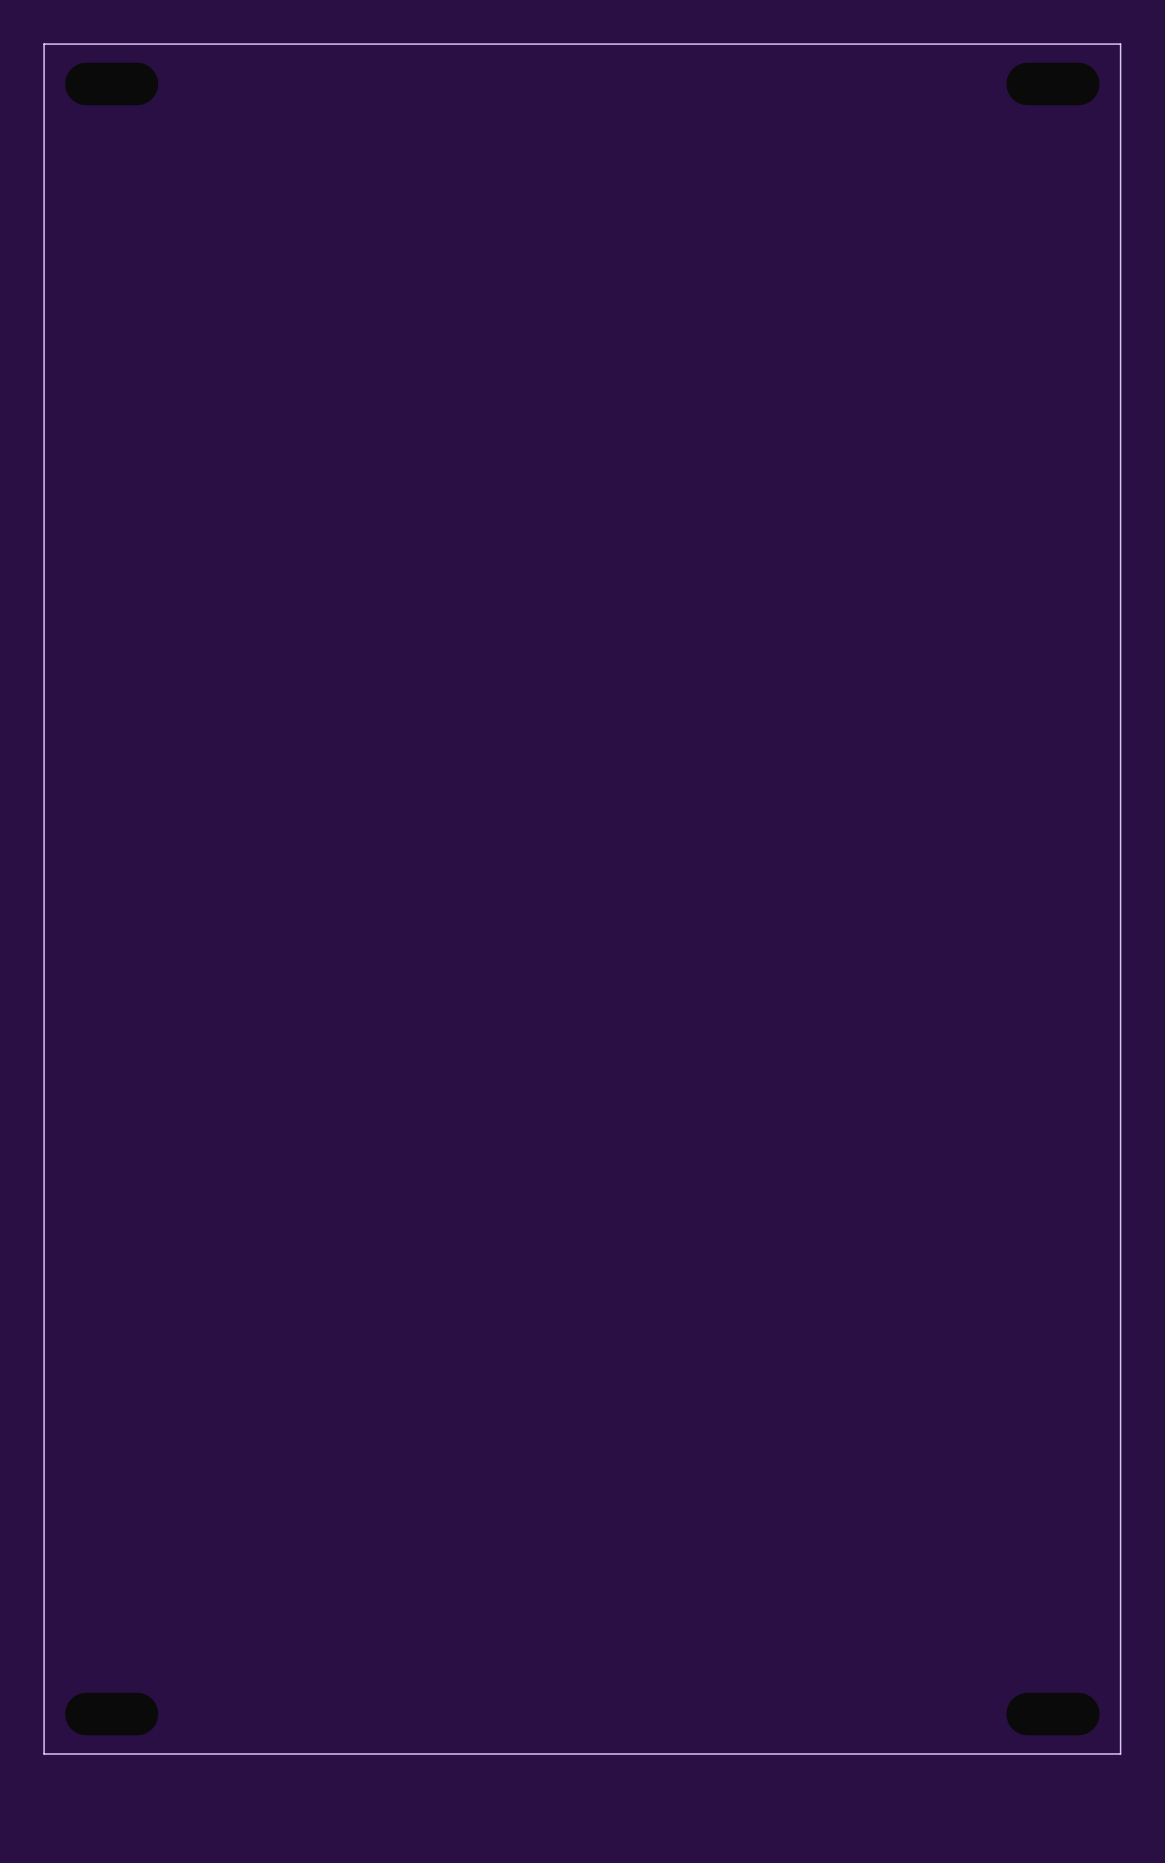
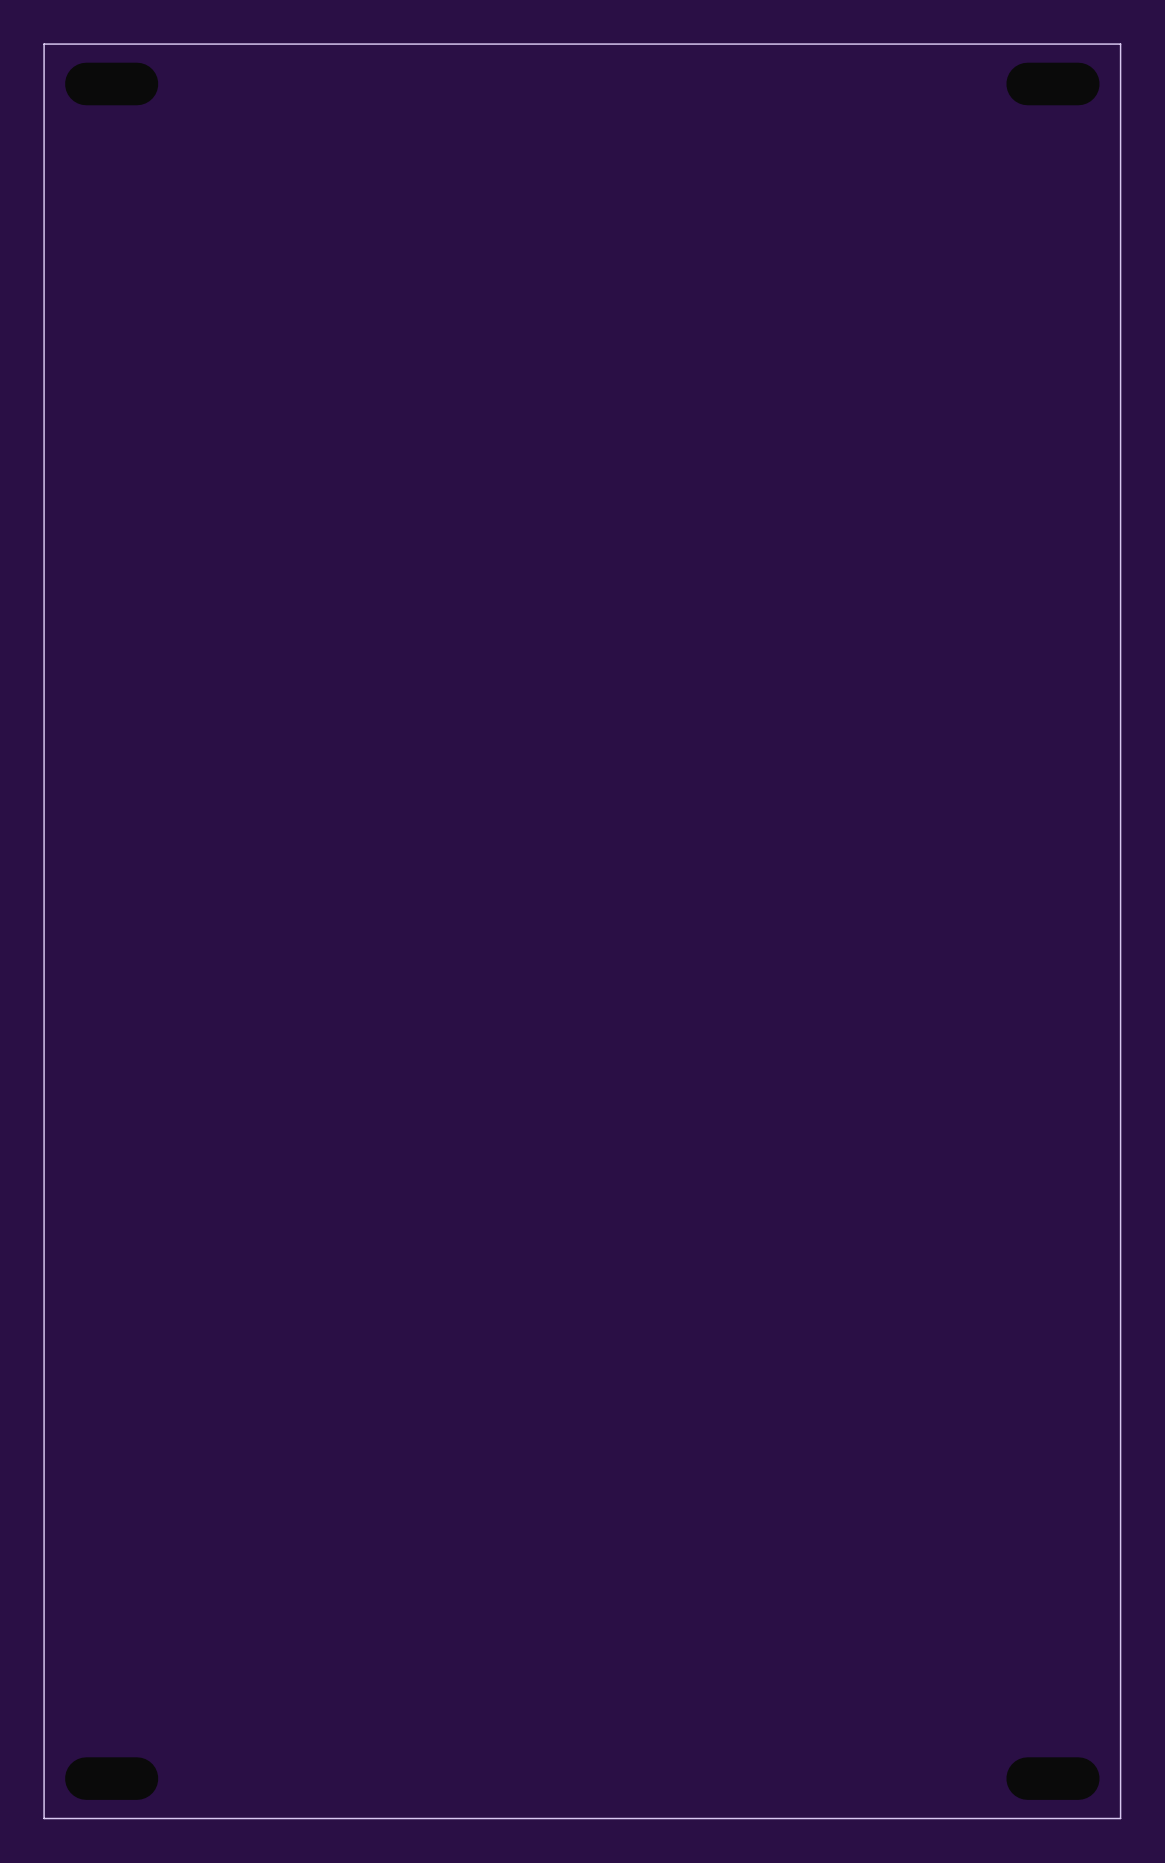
part position: (111, 1714) -> (111, 1778)
part position: (1052, 1714) -> (1052, 1778)
board edge: (44, 1753) (1120, 1753) -> (44, 1753) (44, 1818) (1120, 1818) (1120, 1753)

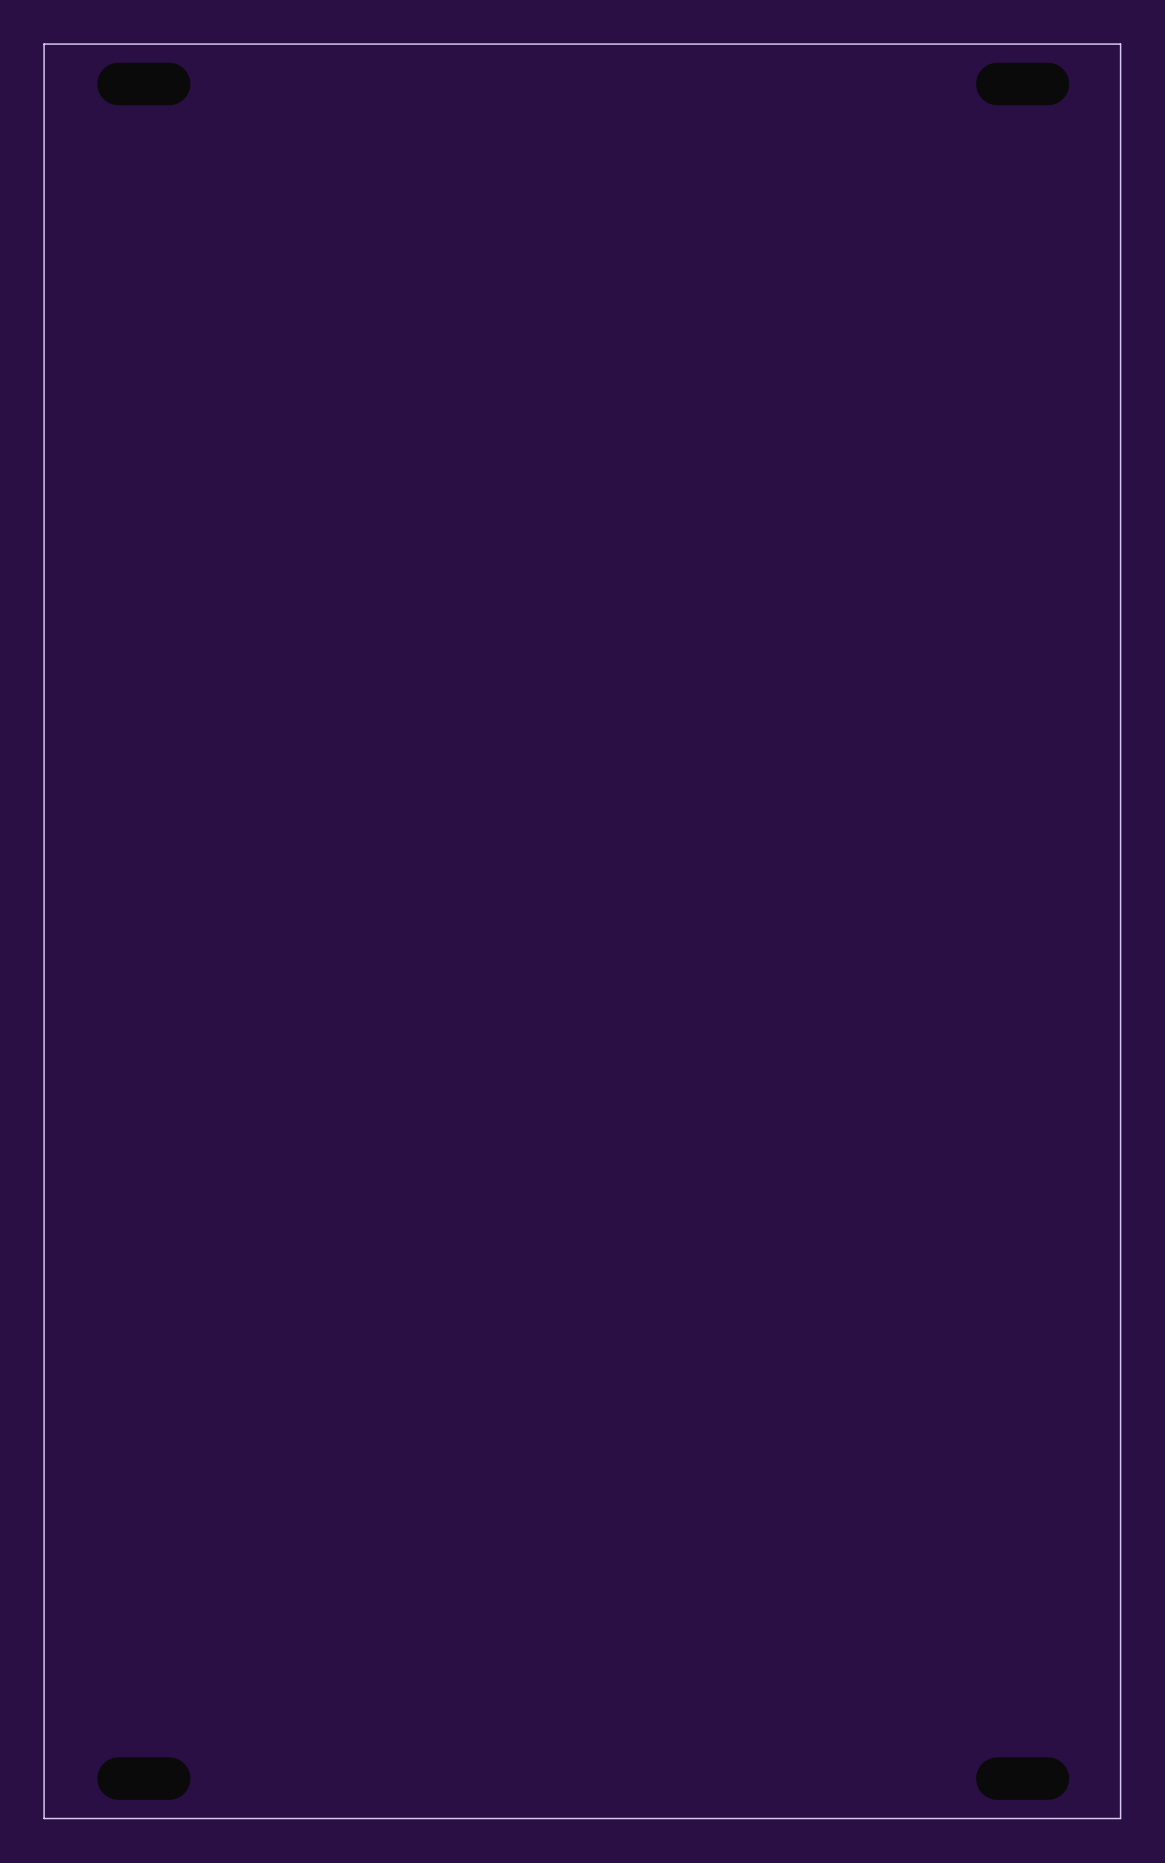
part position: (111, 83) -> (143, 83)
part position: (1052, 83) -> (1022, 83)
part position: (111, 1778) -> (143, 1778)
part position: (1052, 1778) -> (1022, 1778)

